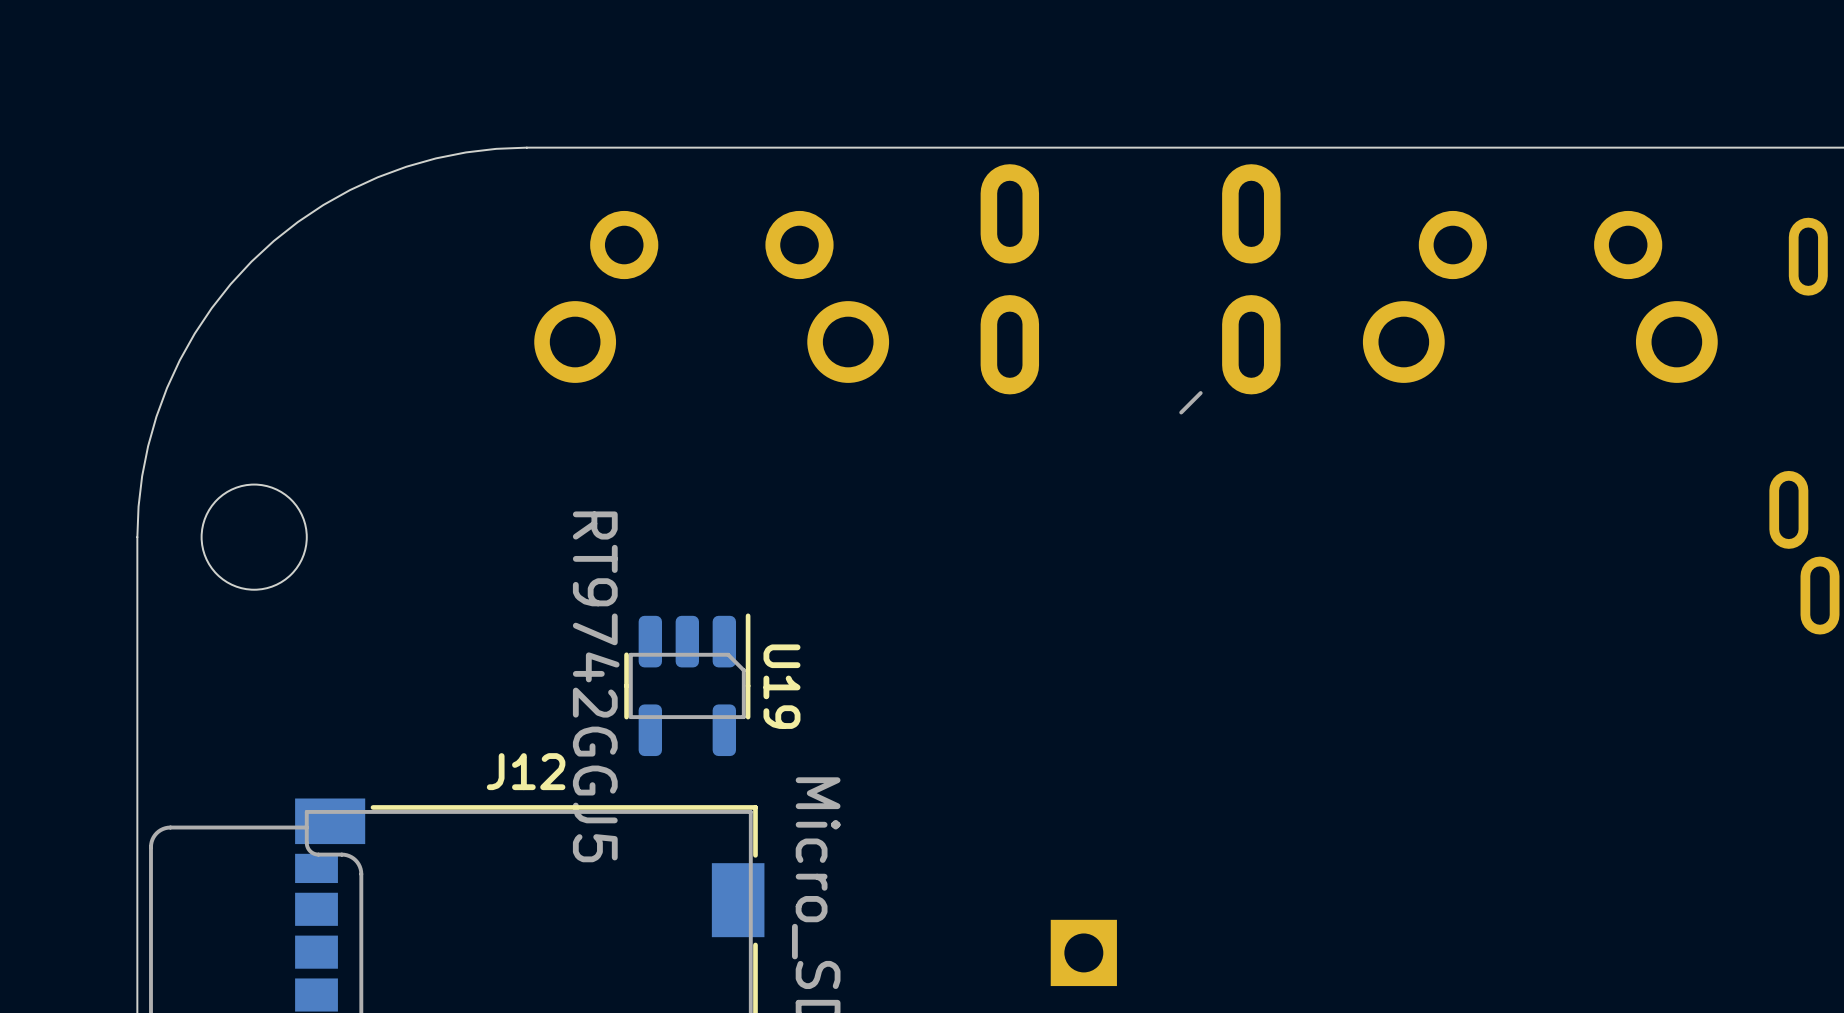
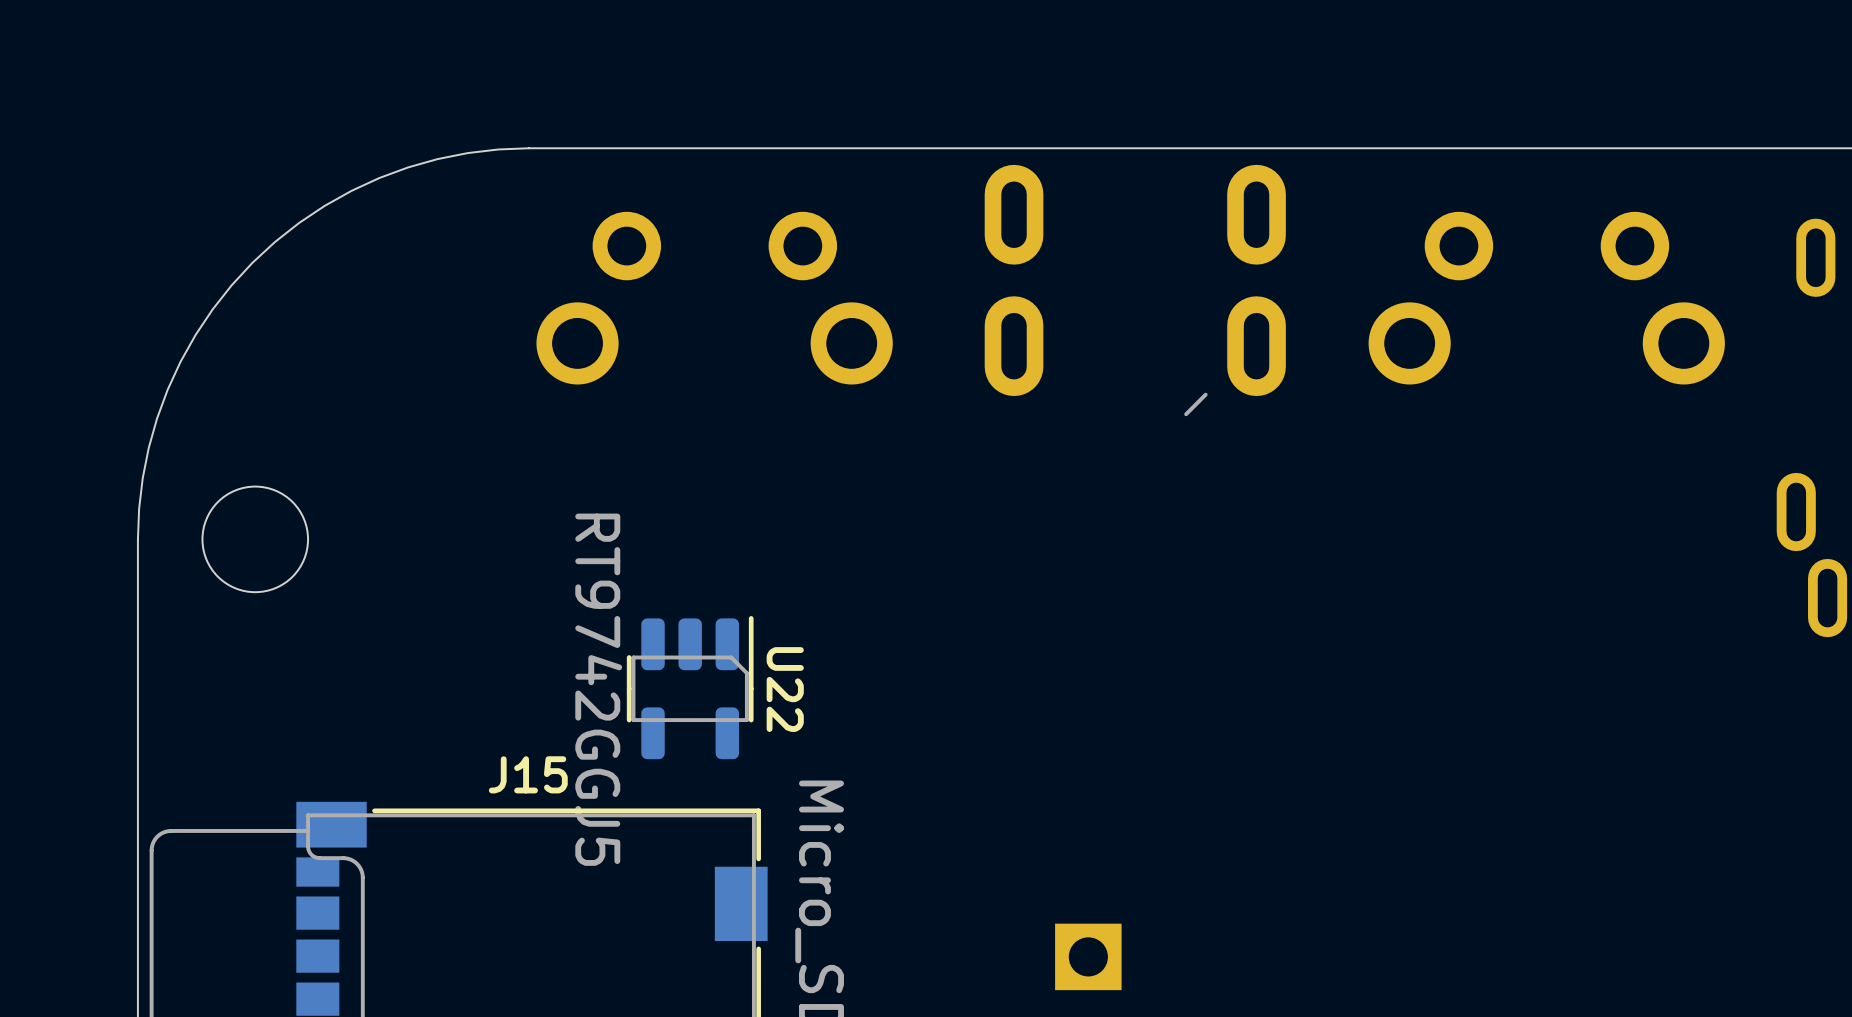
U19 name: U19 (781, 686) -> U22 (785, 689)
J12 name: J12 (526, 771) -> J15 (528, 774)

